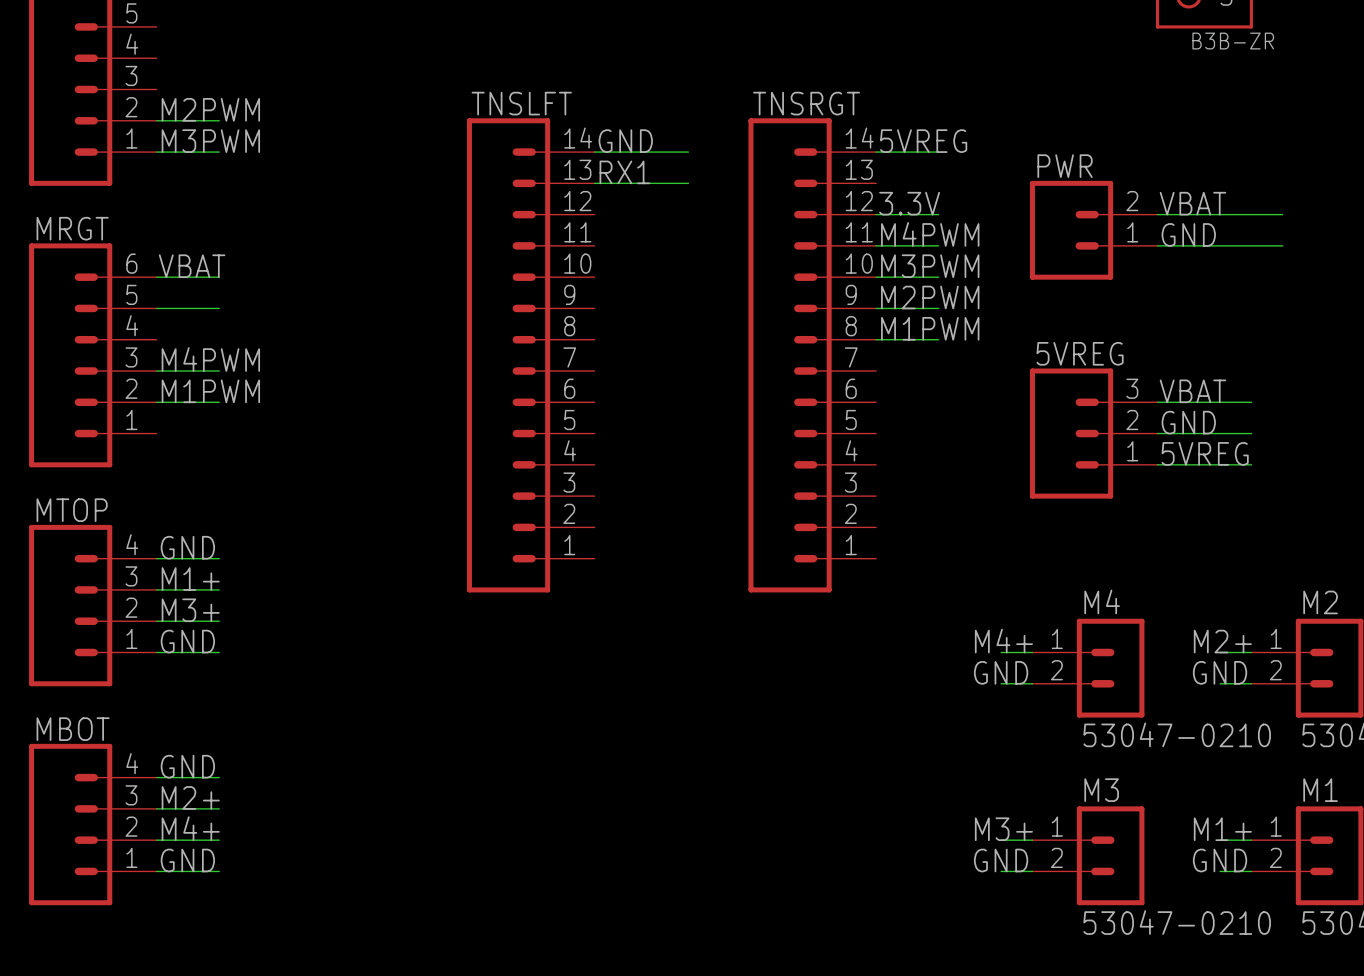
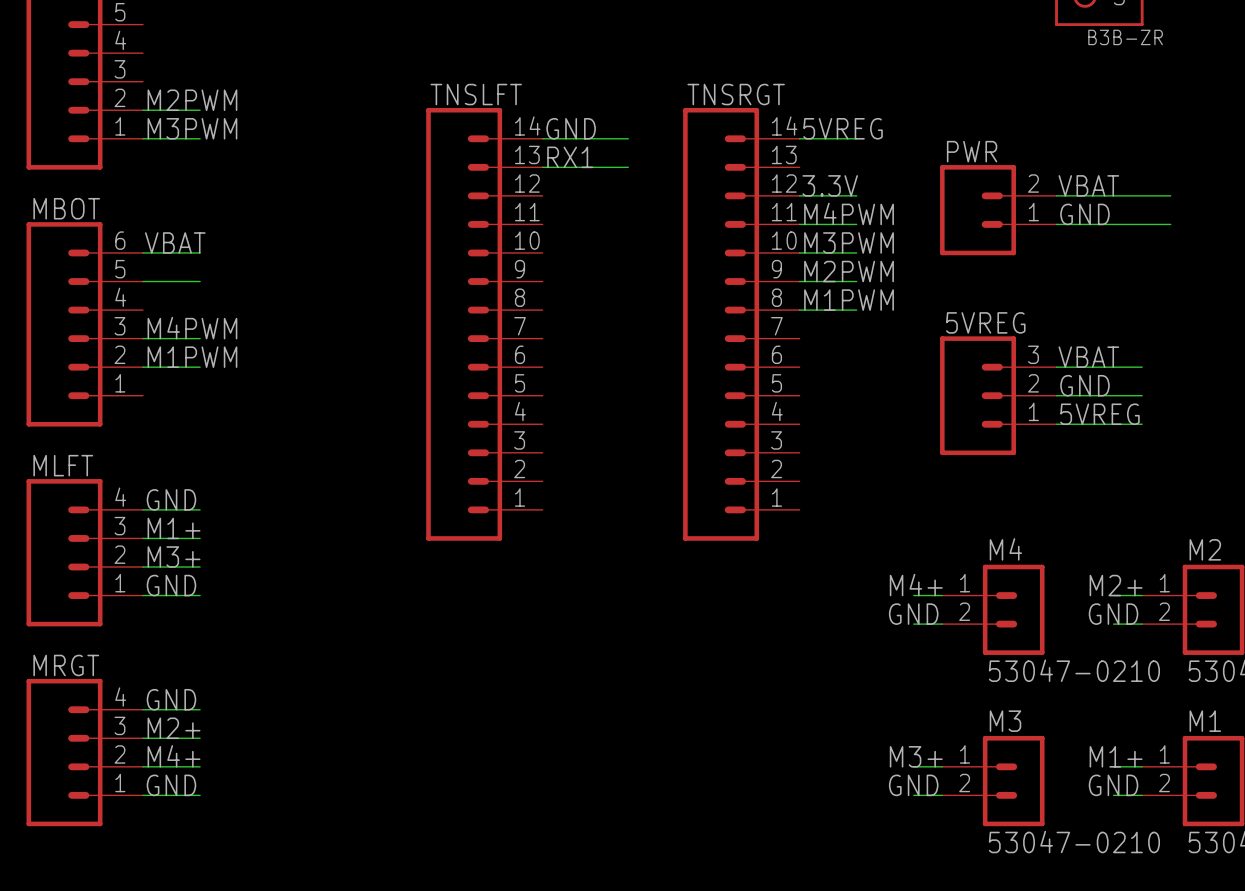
MRGT name: MRGT (72, 228) -> MBOT (66, 208)
MTOP name: MTOP (72, 510) -> MLFT (63, 465)
MBOT name: MBOT (73, 729) -> MRGT (66, 665)

